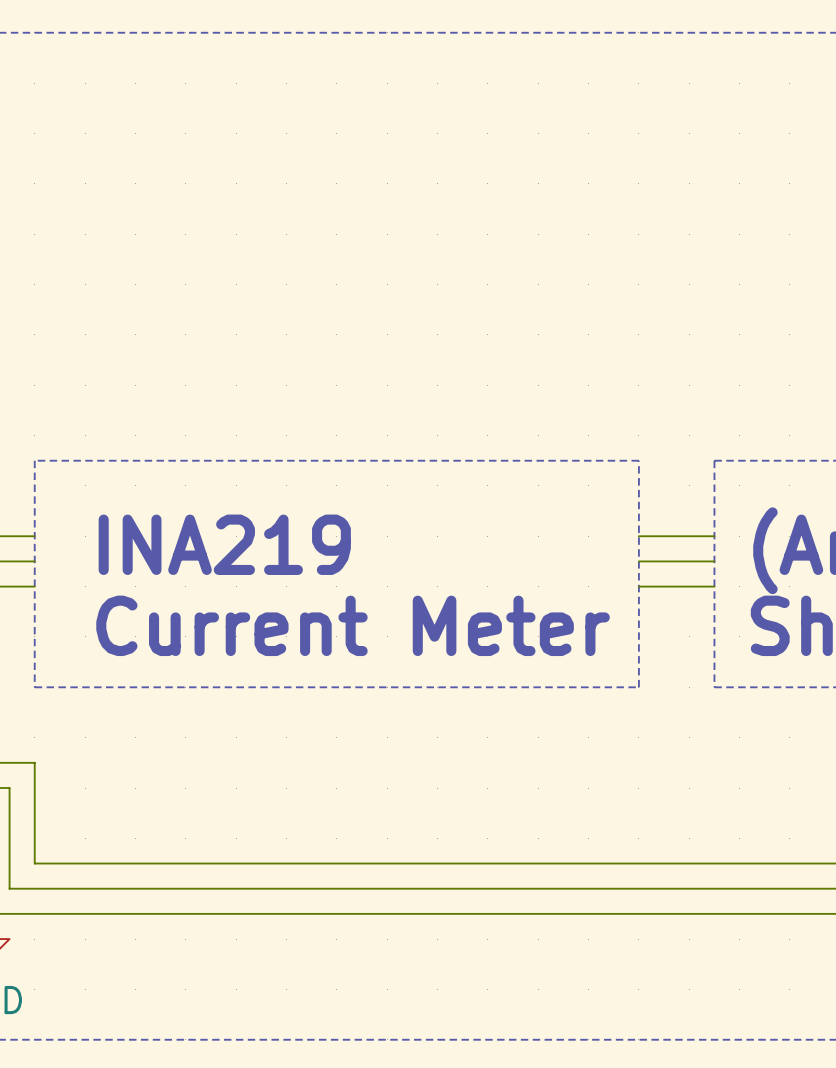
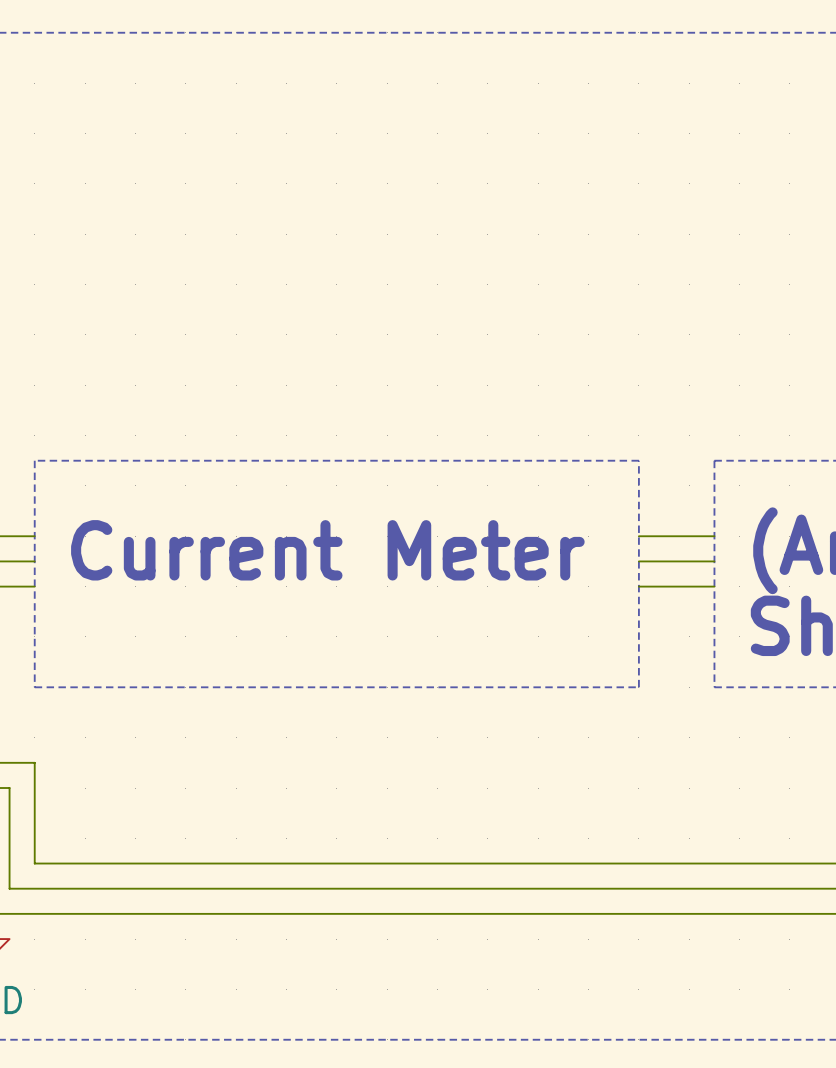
text: INA219 (224, 544) -> none
text position: Current Meter (353, 625) -> Current Meter (327, 550)

